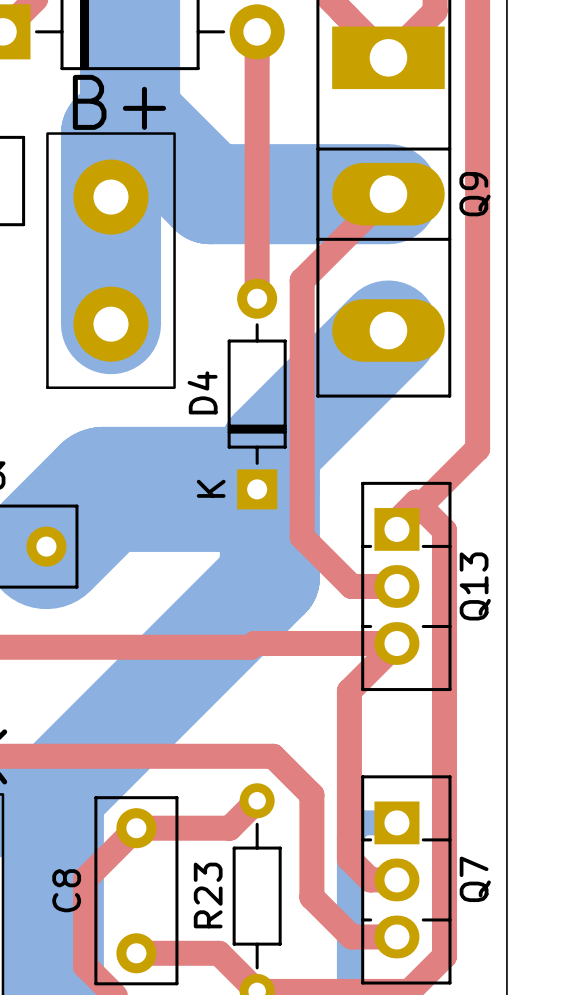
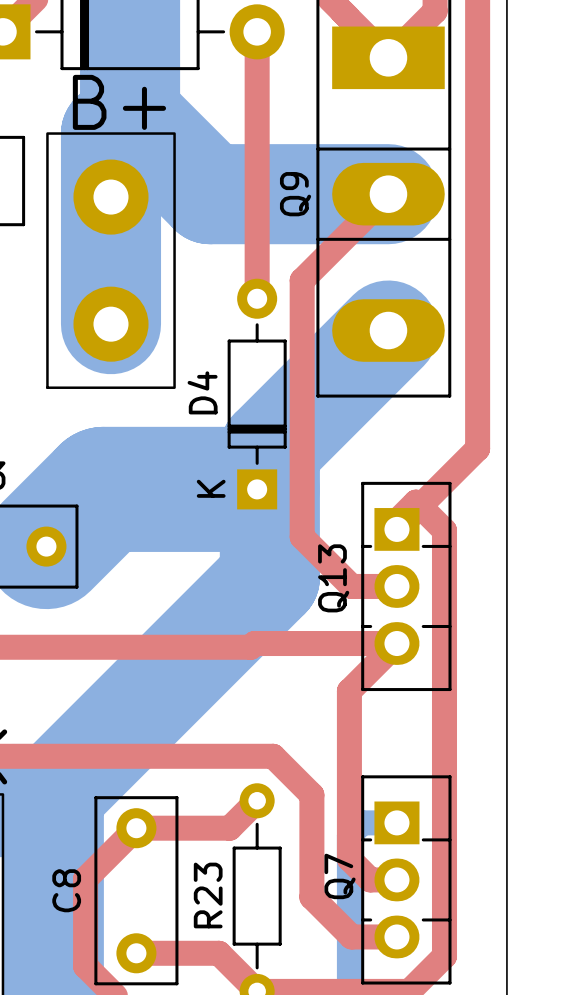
Q9 name position: Q9 (475, 194) -> Q9 (295, 194)
Q13 name position: Q13 (475, 586) -> Q13 (333, 578)
Q7 name position: Q7 (475, 879) -> Q7 (340, 876)

